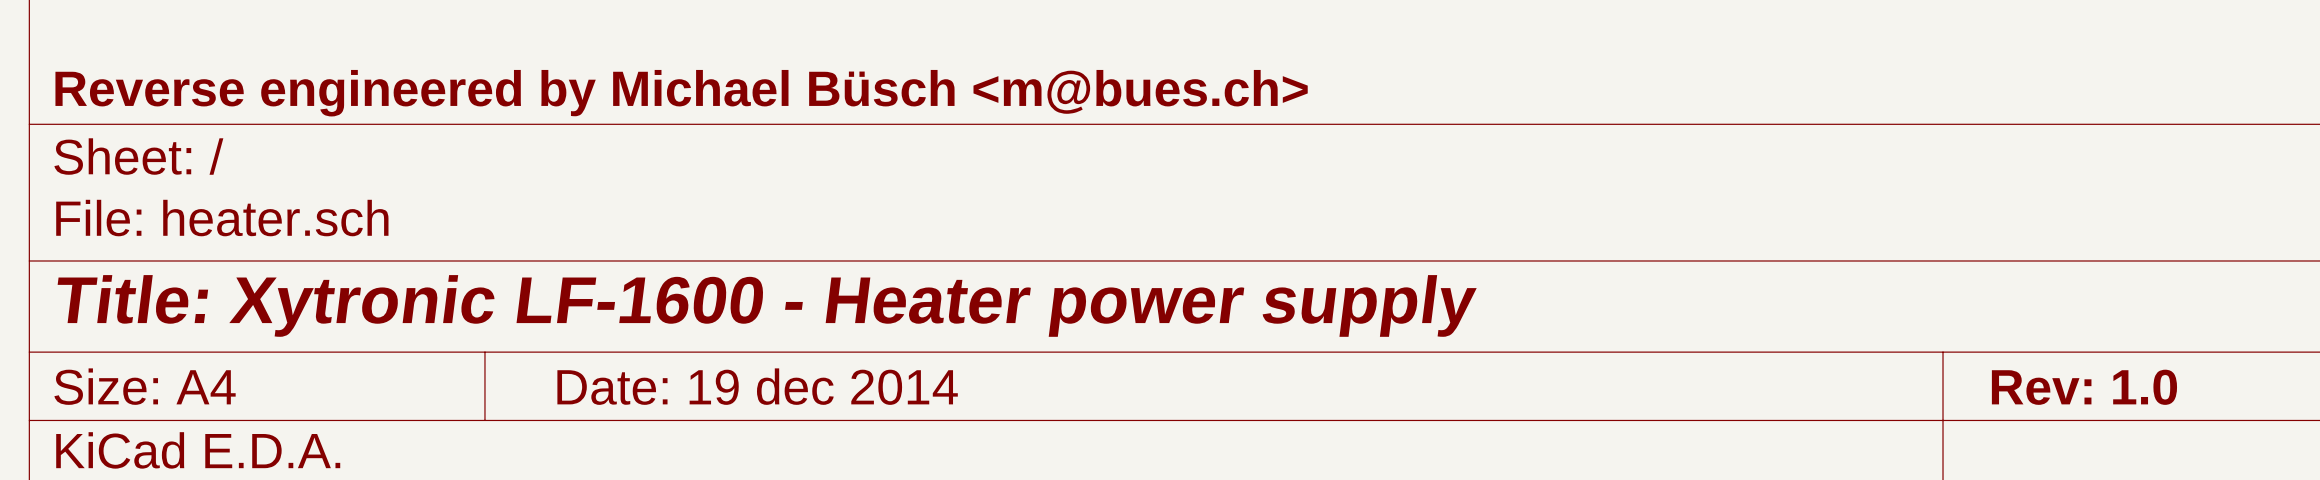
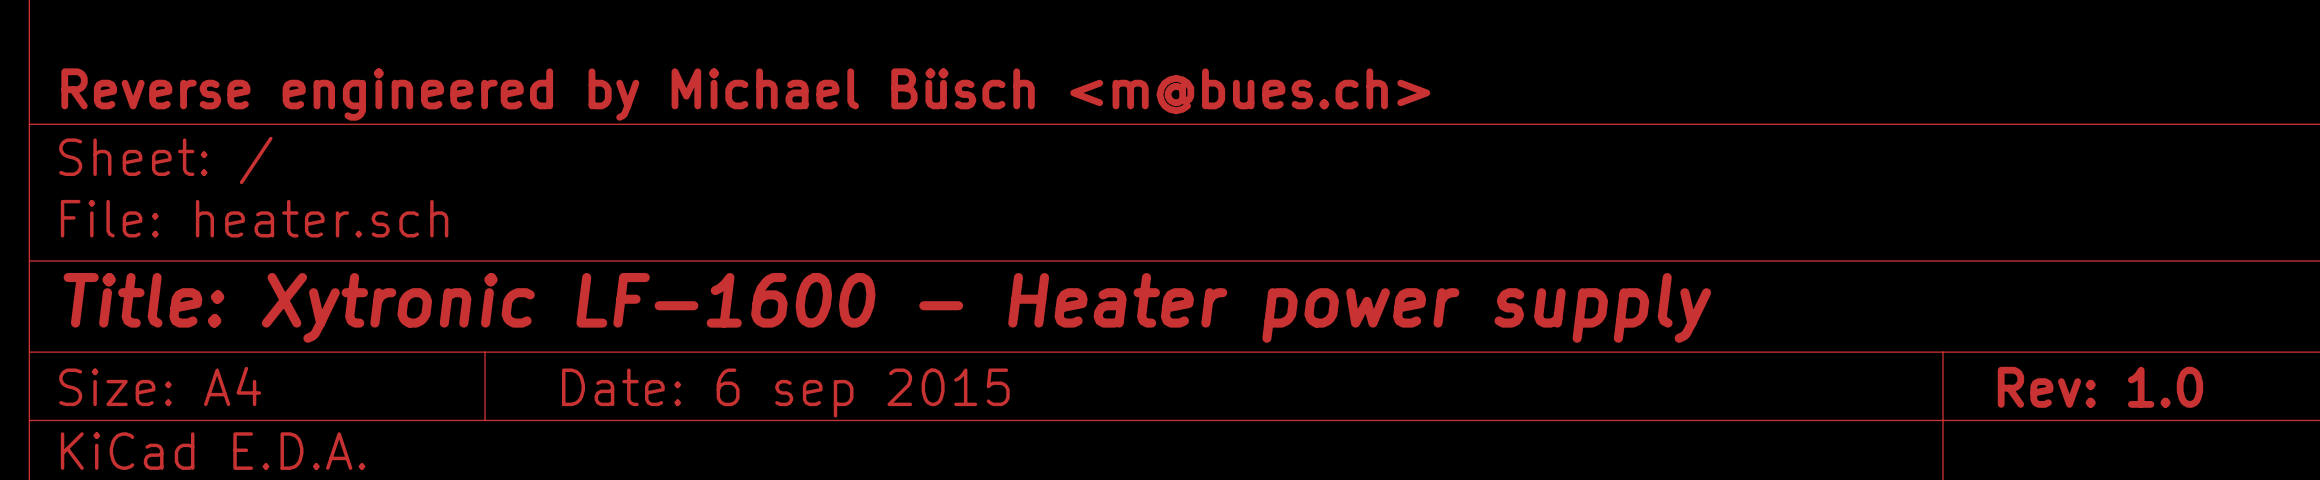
title block: Date: 19 dec 2014 (757, 386) -> Date: 6 sep 2015 (785, 392)

